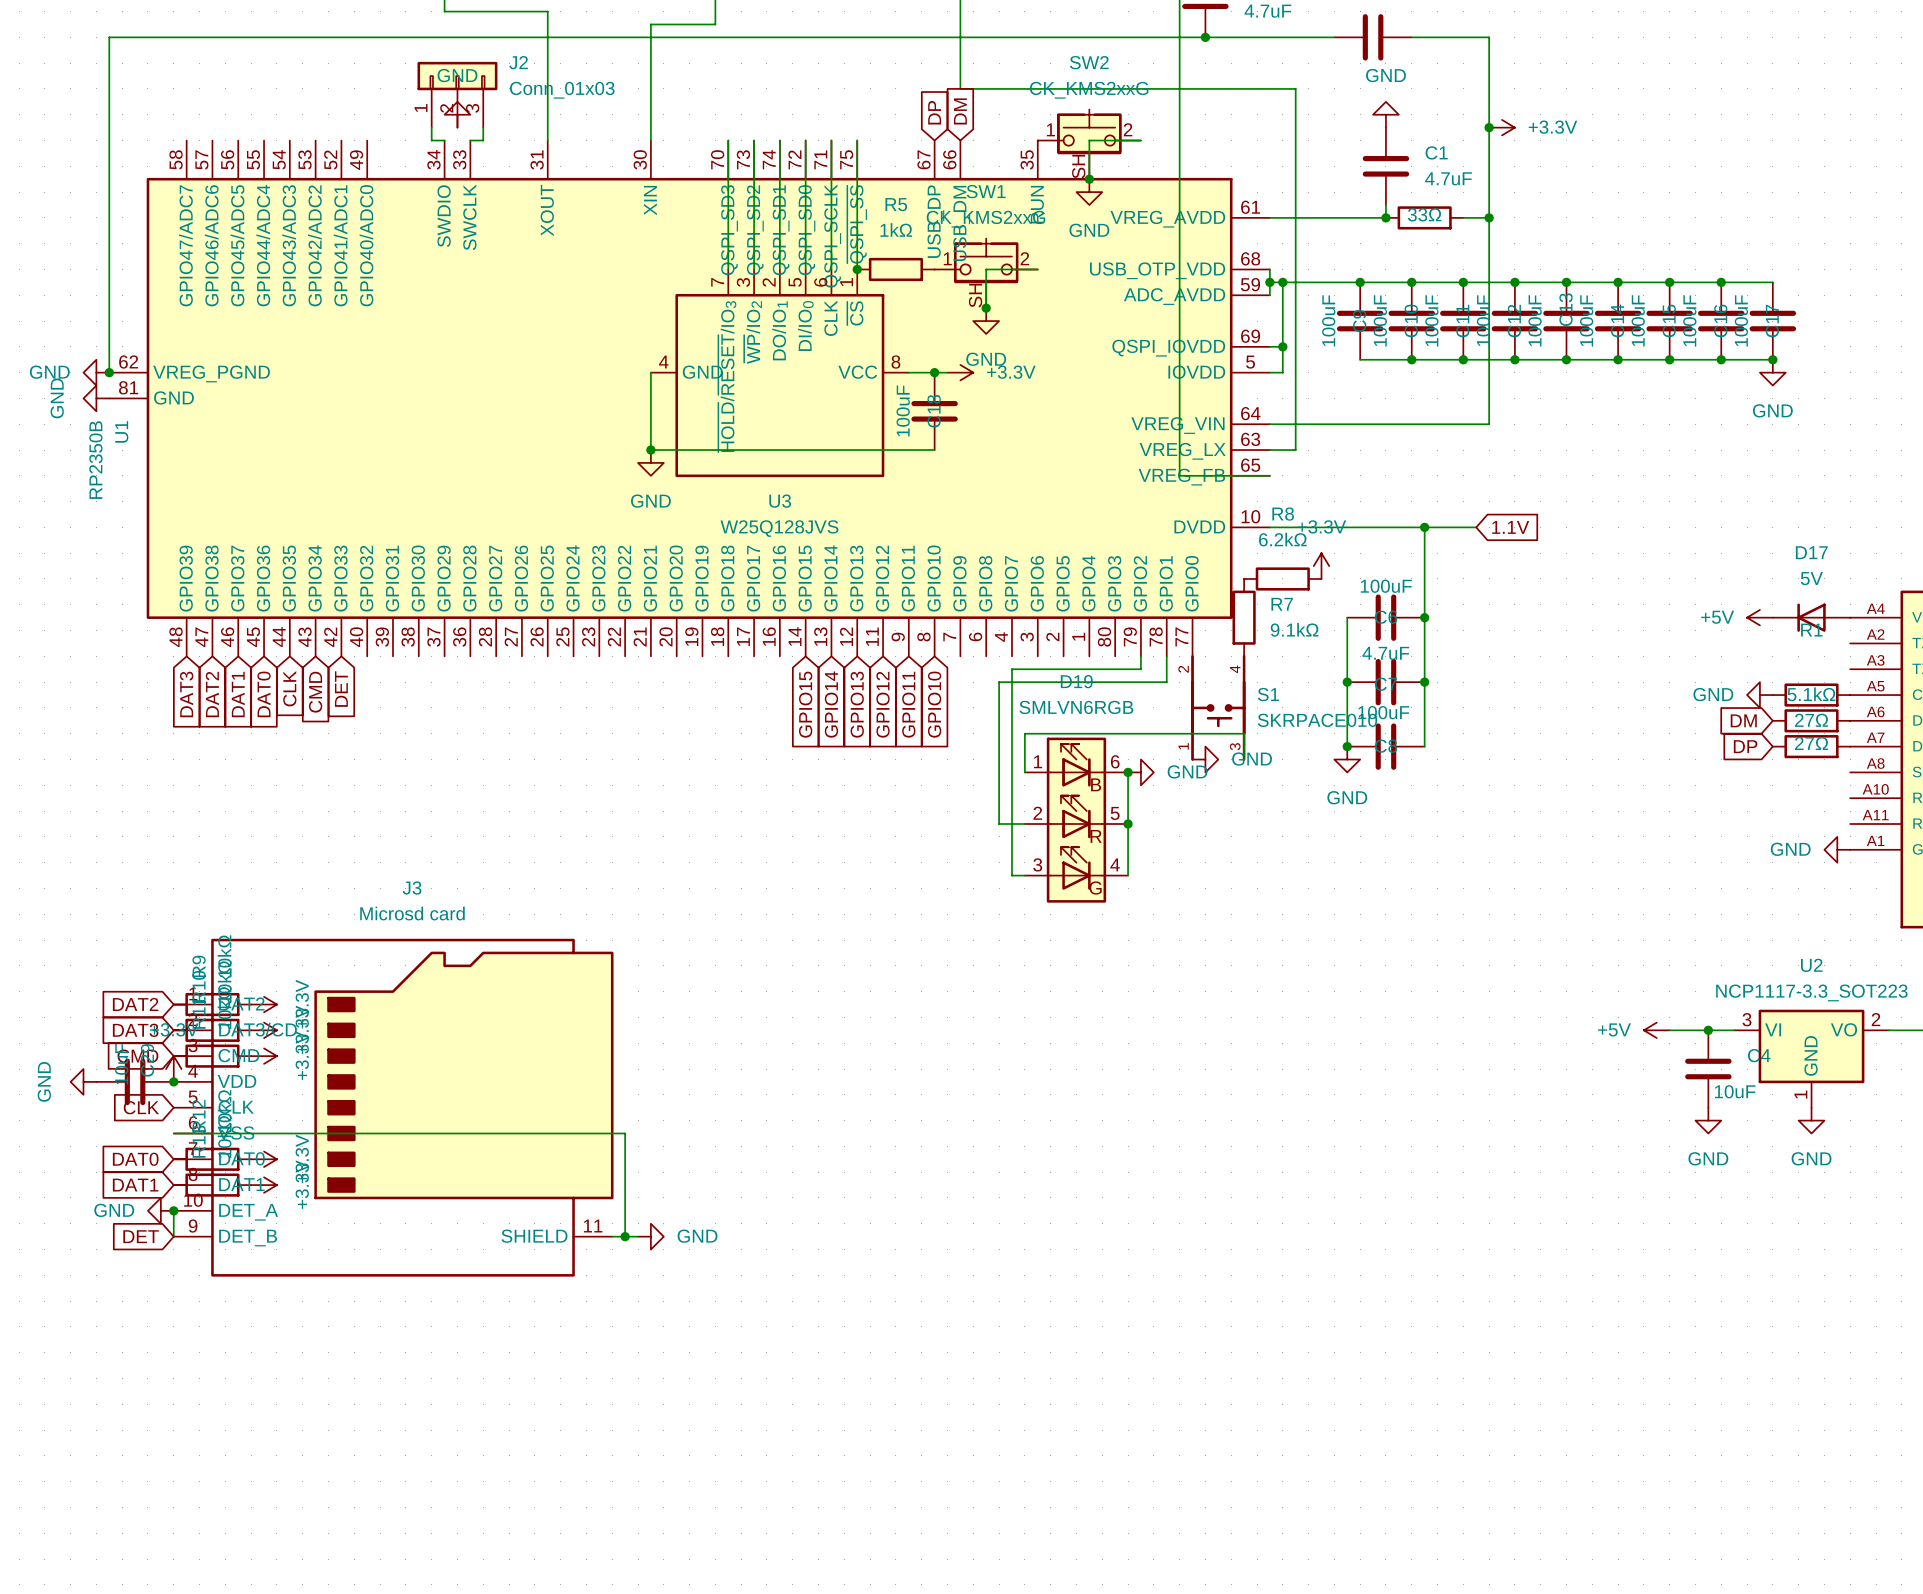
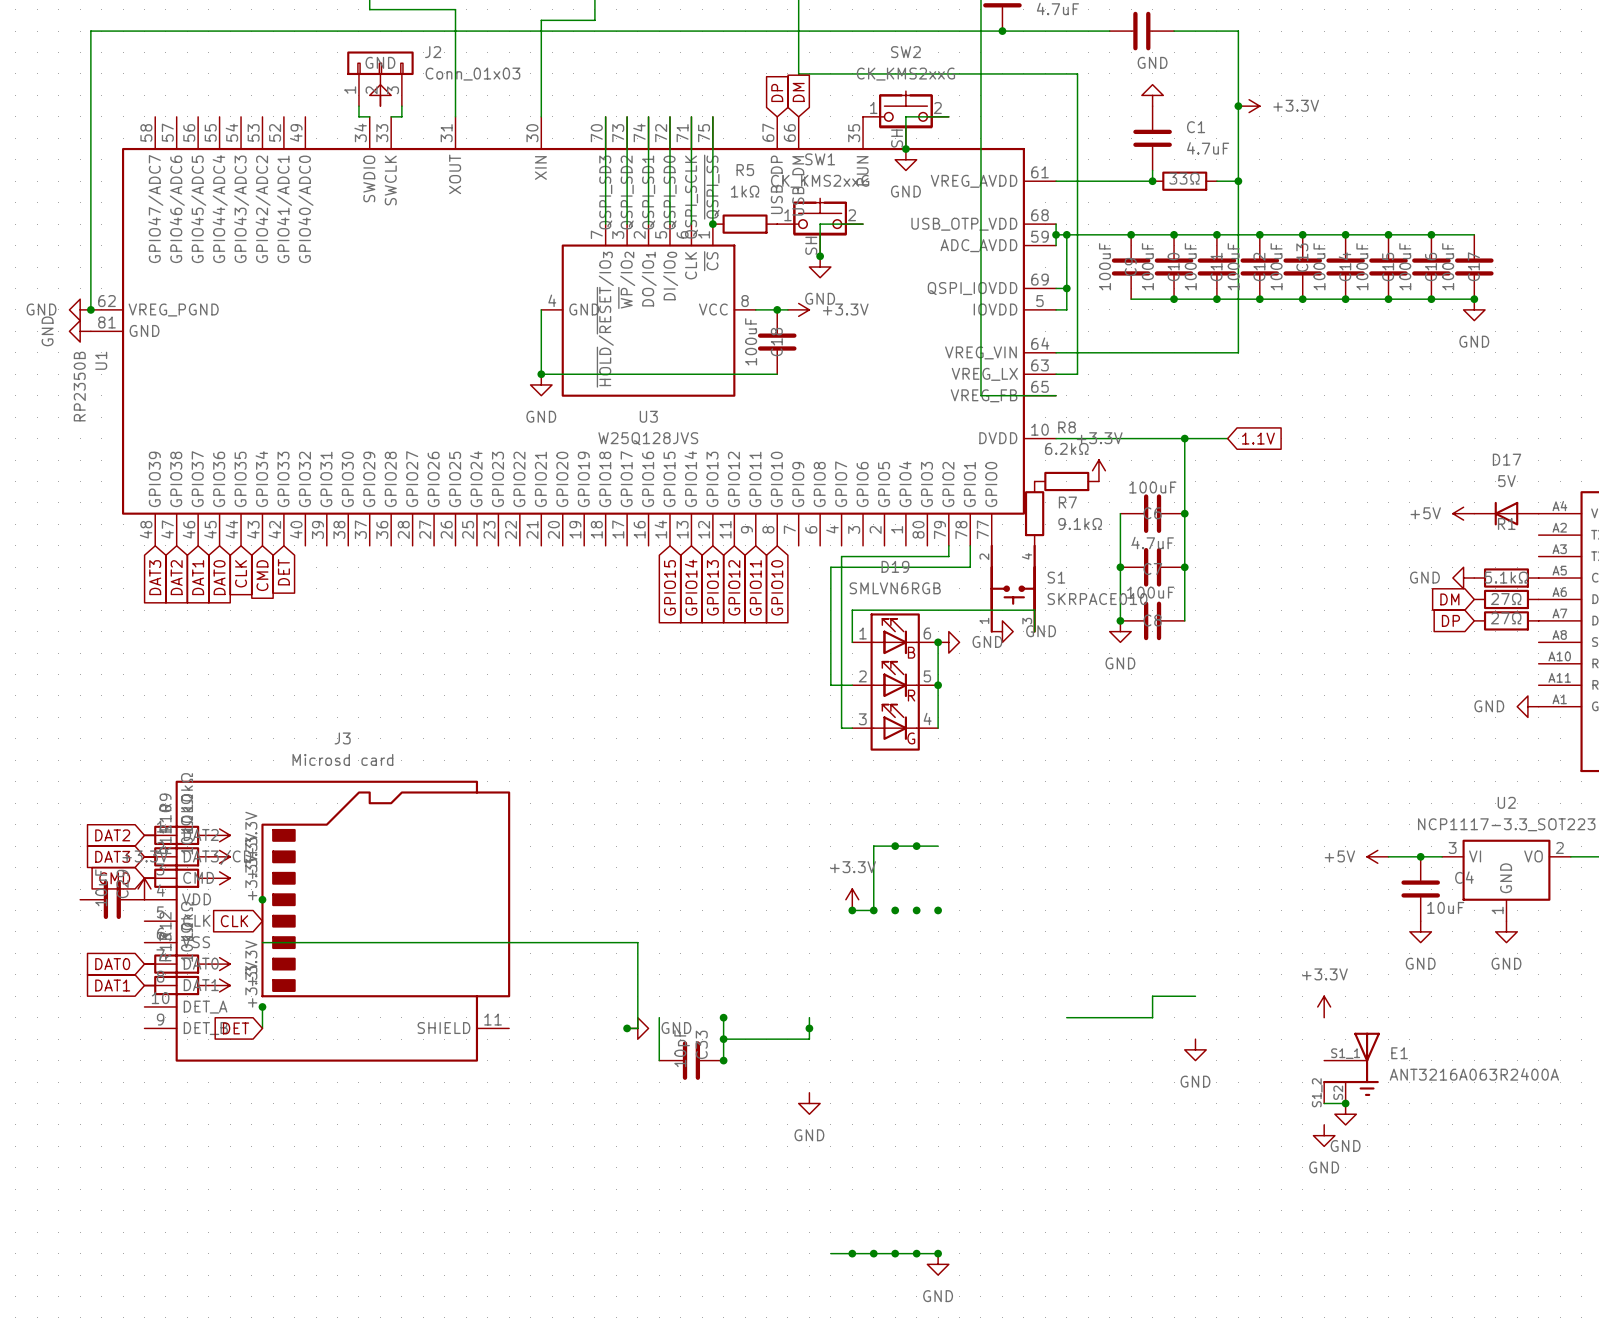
junction: none -> (895, 846)
junction: none -> (916, 846)
wire: none -> (938, 846) (873, 846) (873, 910) (852, 910)
power symbol: GND (83, 1081) -> none
junction: (173, 1081) -> none
junction: none -> (262, 899)
power symbol: none -> +3.3V (852, 899)
junction: none -> (852, 910)
junction: none -> (873, 910)
junction: none -> (895, 910)
junction: none -> (916, 910)
junction: none -> (938, 910)
global label position: CLK (141, 1107) -> CLK (234, 921)
wire: (173, 1133) (315, 1133) -> none
wire: (625, 1133) (625, 1236) -> (519, 942) (637, 942) (637, 1028) (627, 1028)
wire: none -> (1195, 996) (1152, 996) (1152, 1017) (1066, 1017)
power symbol: GND (160, 1210) -> none
wire: (173, 1210) (173, 1236) -> (262, 1006) (262, 1028)
junction: (173, 1210) -> none
junction: none -> (262, 1006)
power symbol: none -> +3.3V (1324, 1006)
wire: none -> (659, 1017) (659, 1060)
wire: none -> (723, 1017) (723, 1060)
junction: none -> (723, 1017)
wire: none -> (809, 1017) (809, 1039) (723, 1039)
global label position: DET (141, 1236) -> DET (236, 1028)
wire: (612, 1236) (638, 1236) -> none
junction: (625, 1236) -> none
power symbol position: GND (650, 1236) -> GND (637, 1028)
junction: none -> (627, 1028)
junction: none -> (809, 1028)
junction: none -> (723, 1039)
power symbol: none -> GND (1195, 1049)
C33: none -> 10pF (691, 1060)
junction: none -> (723, 1060)
E1: none -> ANT3216A063R2400A (1351, 1068)
power symbol: none -> GND (809, 1103)
wire: none -> (1324, 1103) (1345, 1103)
junction: none -> (1345, 1103)
power symbol: none -> GND (1345, 1114)
power symbol: none -> GND (1324, 1135)
wire: none -> (830, 1253) (938, 1253)
junction: none -> (852, 1253)
junction: none -> (873, 1253)
junction: none -> (895, 1253)
junction: none -> (916, 1253)
junction: none -> (938, 1253)
power symbol: none -> GND (938, 1264)

